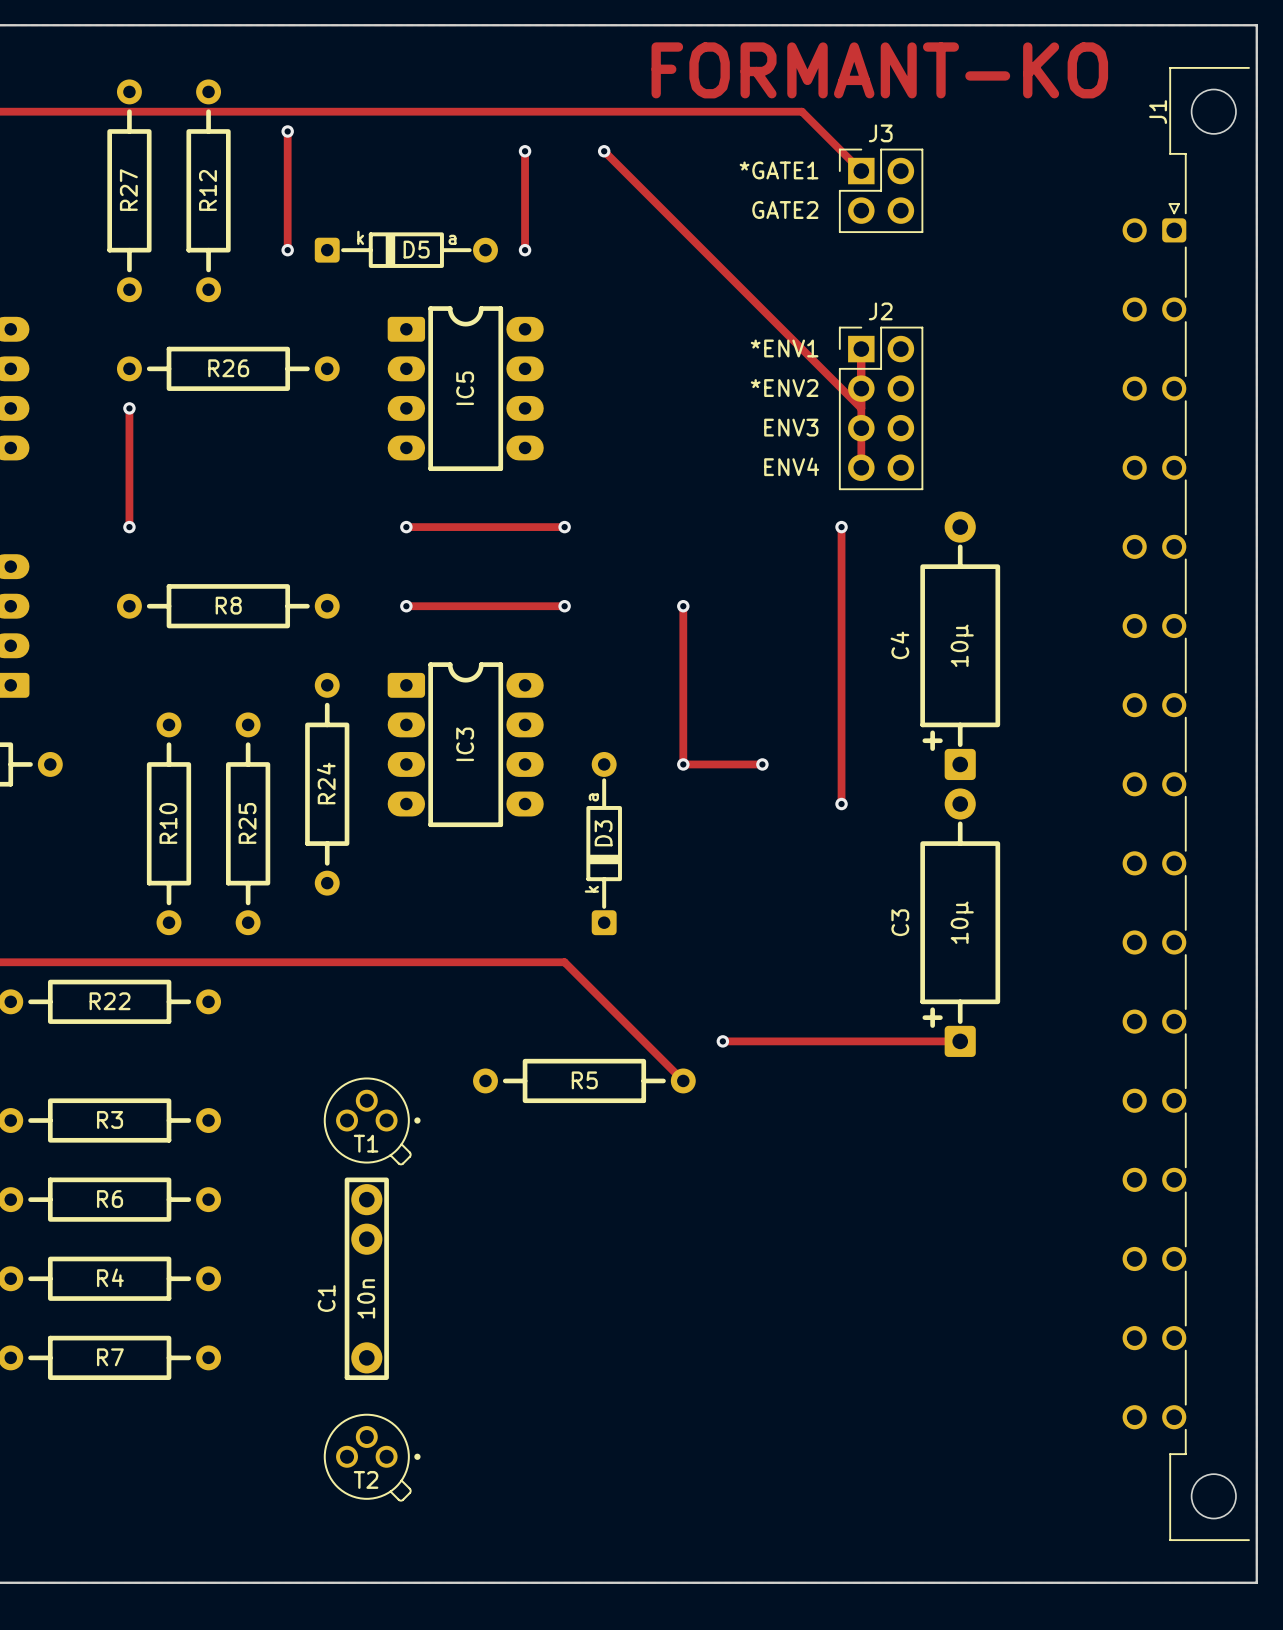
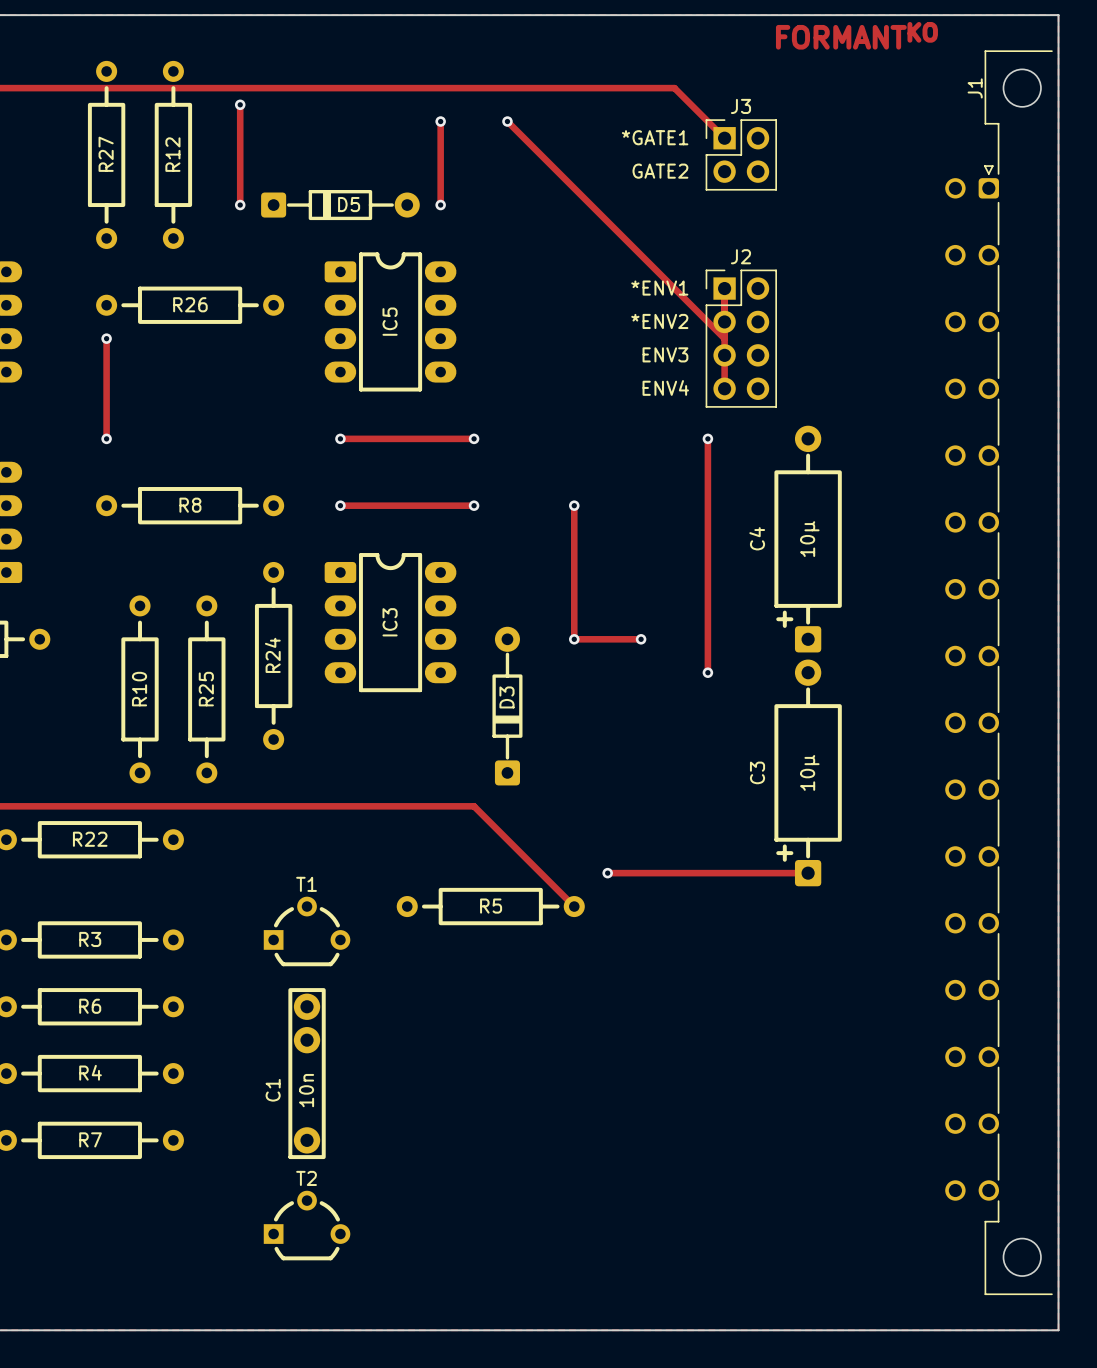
text: FORMANT-KO (879, 70) -> FORMANTKO (856, 35)
D5 footprint: [314, 232, 498, 268] -> [261, 190, 420, 221]
D3 footprint: [586, 752, 622, 936] -> [492, 626, 523, 786]
T1 footprint: [323, 1077, 421, 1166] -> [263, 896, 351, 967]
T1 name position: T1 (366, 1143) -> T1 (306, 884)
T2 footprint: [323, 1413, 421, 1502] -> [263, 1190, 351, 1261]
T2 name position: T2 (366, 1479) -> T2 (306, 1178)

